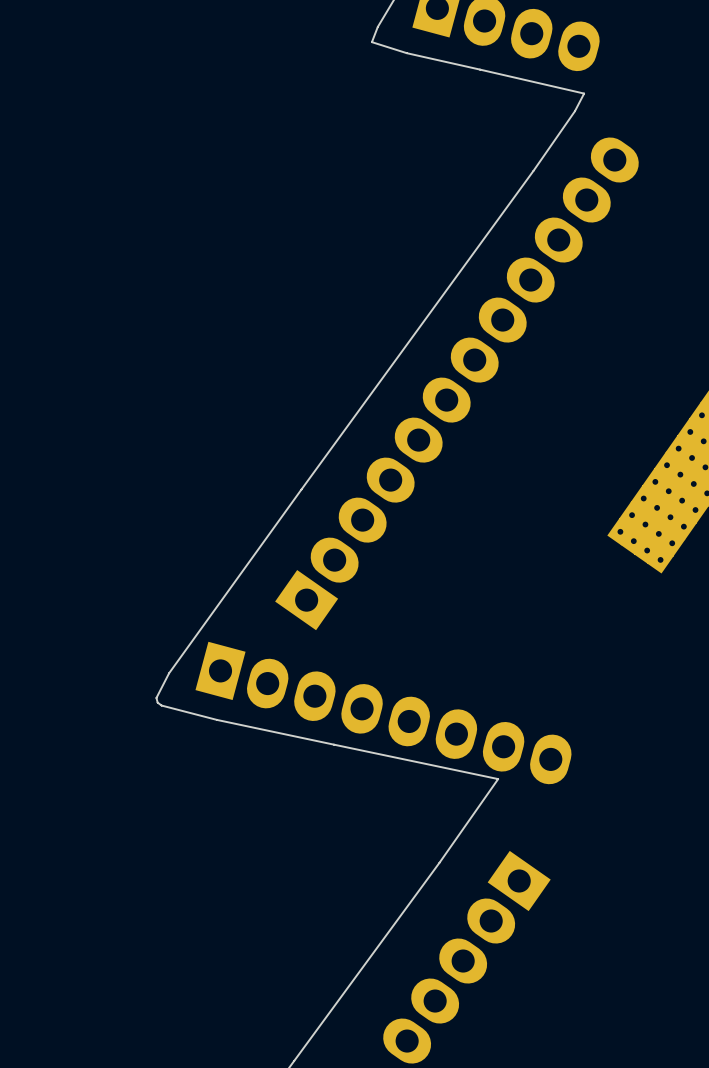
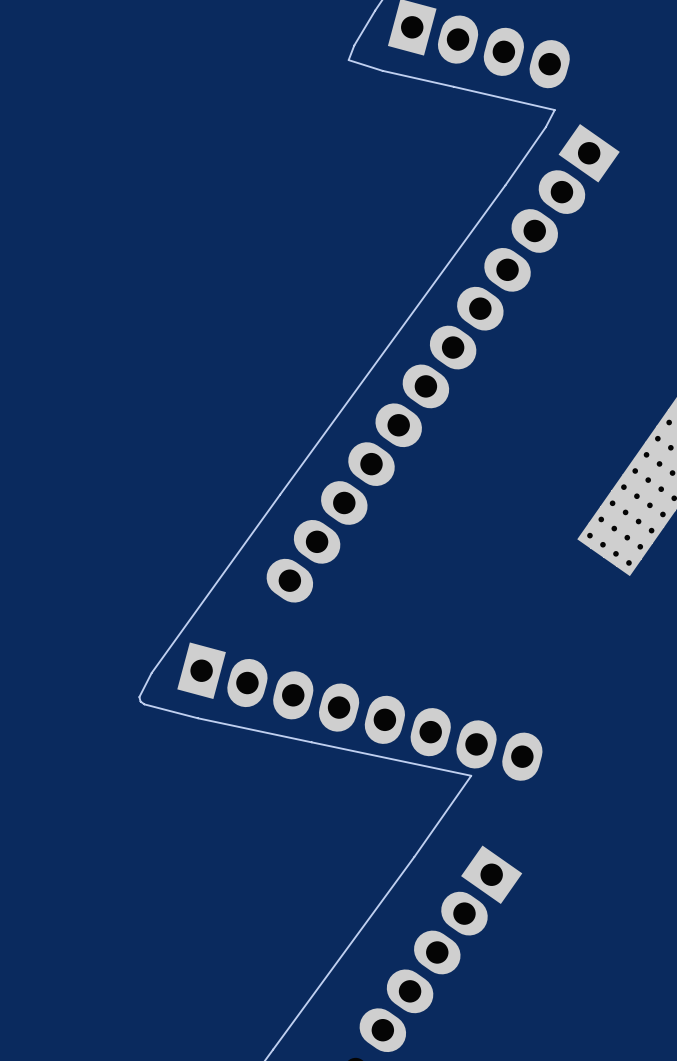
part rotation: 0° (456, 383) -> 180° (443, 363)

